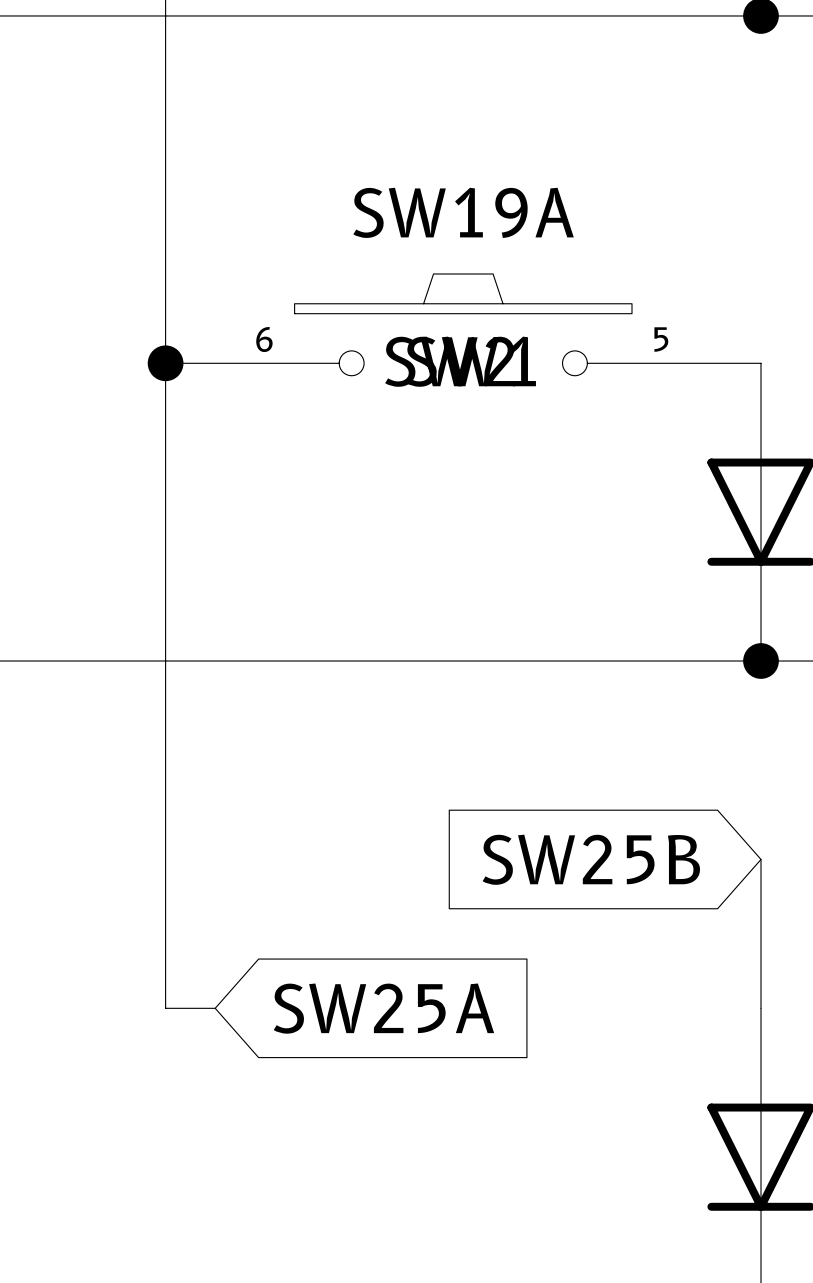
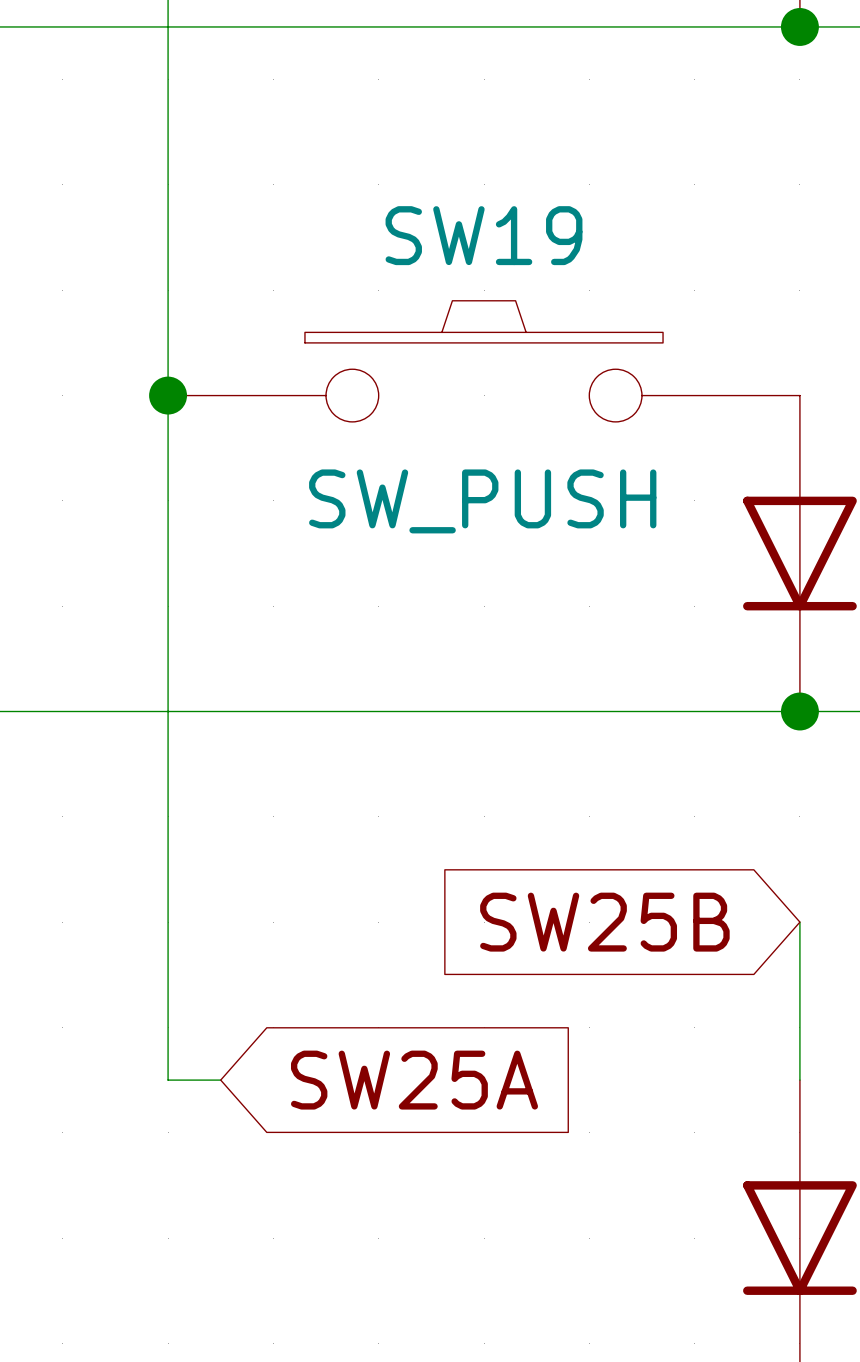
SW19A: (463, 324) -> none
SW19: none -> SW_PUSH (484, 361)

